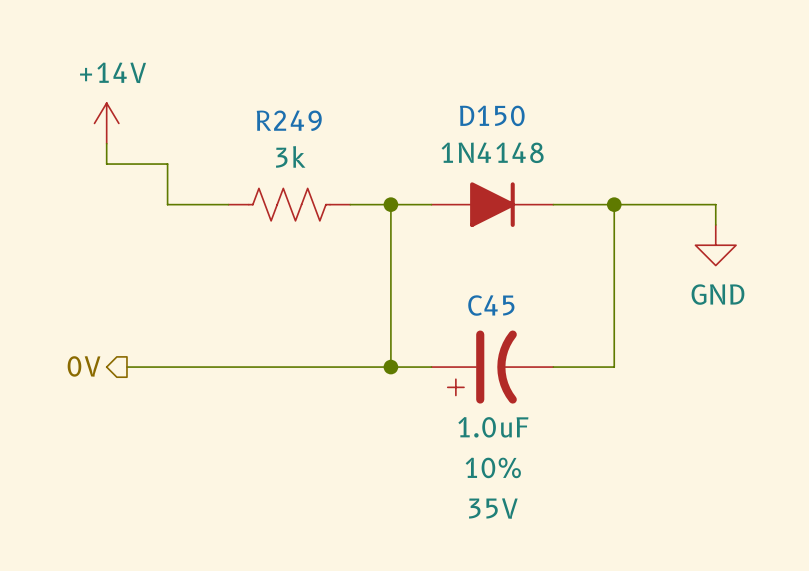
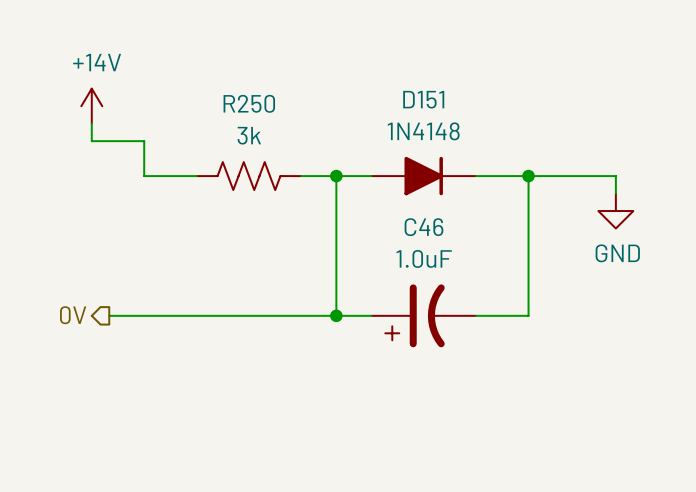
D150 name: D150 (492, 115) -> D151 (423, 99)
R249 name: R249 (289, 120) -> R250 (249, 103)
C45 name: C45 (491, 305) -> C46 (423, 227)
C45 value position: 1.0uF (493, 427) -> 1.0uF (424, 258)
C45 text: 10% (493, 467) -> none
C45 text: 35V (493, 508) -> none

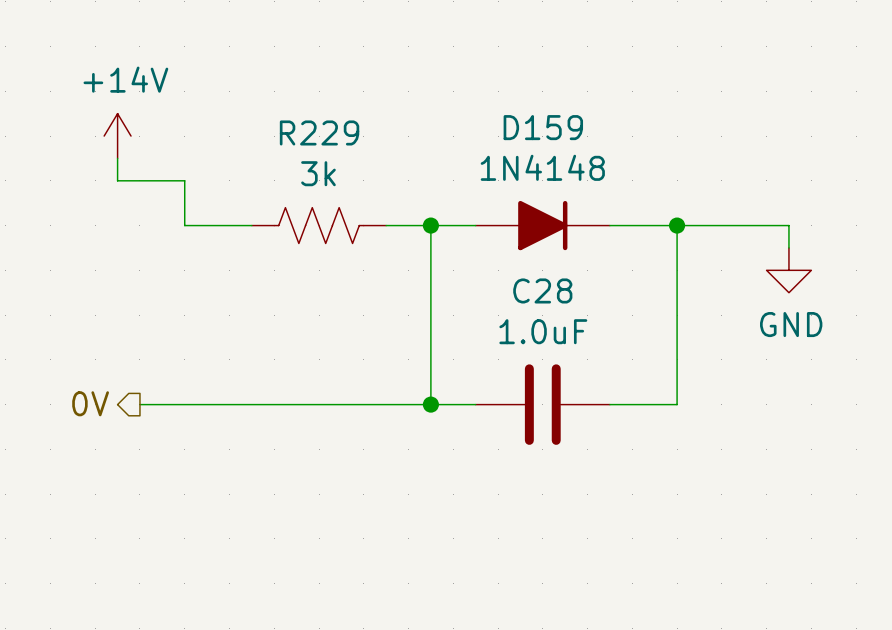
D151 name: D151 (423, 99) -> D159 (543, 127)
R250 name: R250 (249, 103) -> R229 (319, 132)
C46: 1.0uF (423, 315) -> none
C28: none -> 1.0uF (542, 404)

